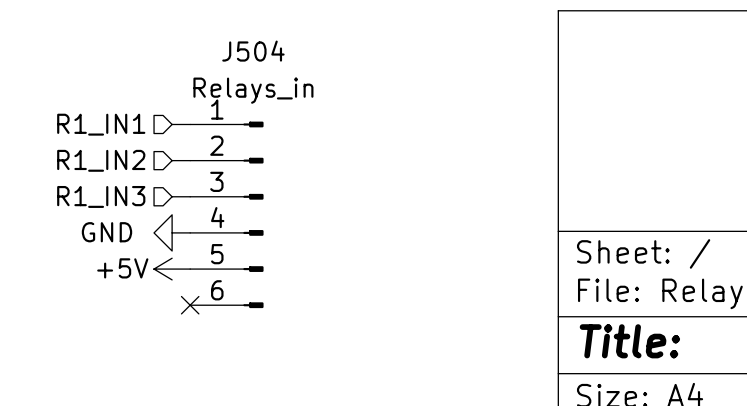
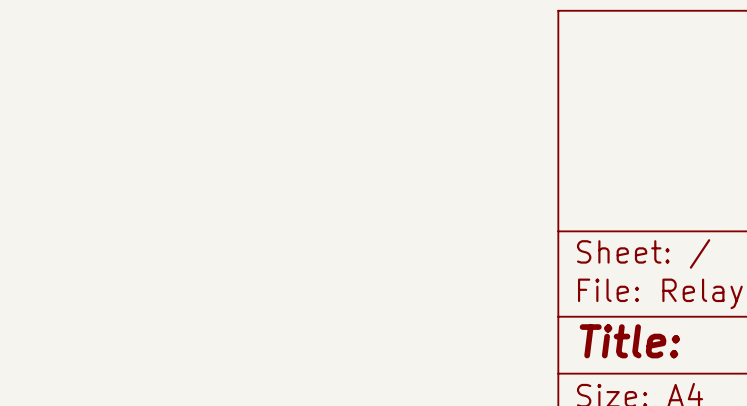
hierarchical label: R1_IN1 (101, 124) -> none
wire: (172, 124) (190, 124) -> none
hierarchical label: R1_IN2 (101, 160) -> none
wire: (172, 160) (190, 160) -> none
hierarchical label: R1_IN3 (101, 196) -> none
wire: (172, 196) (190, 196) -> none
J504: Relays_in (226, 214) -> none
power symbol: GND (172, 232) -> none
power symbol: +5V (172, 269) -> none
no-connect mark: (190, 305) -> none

